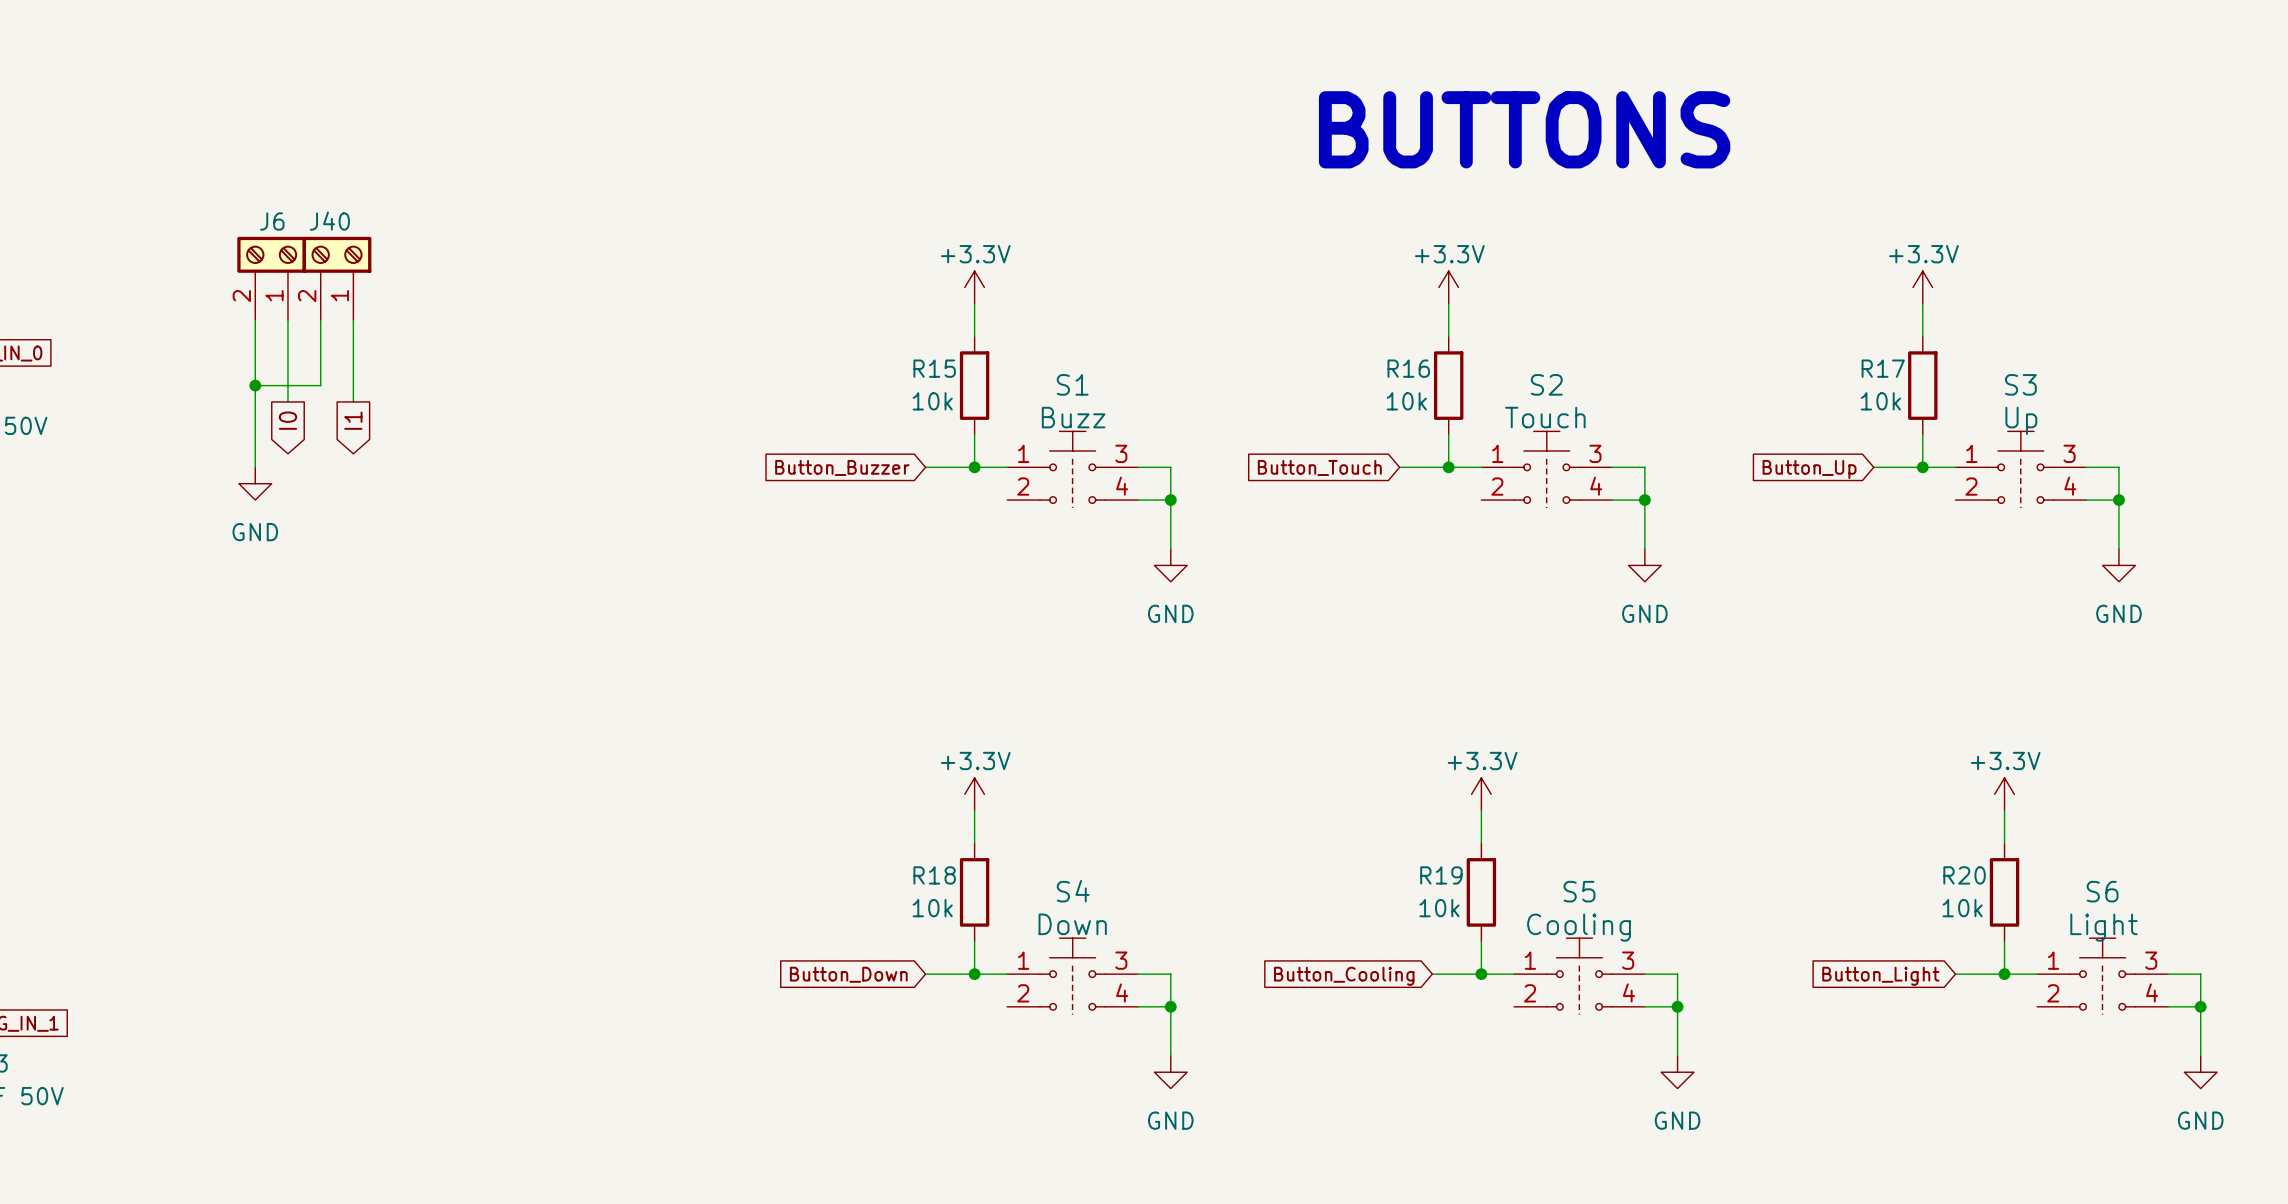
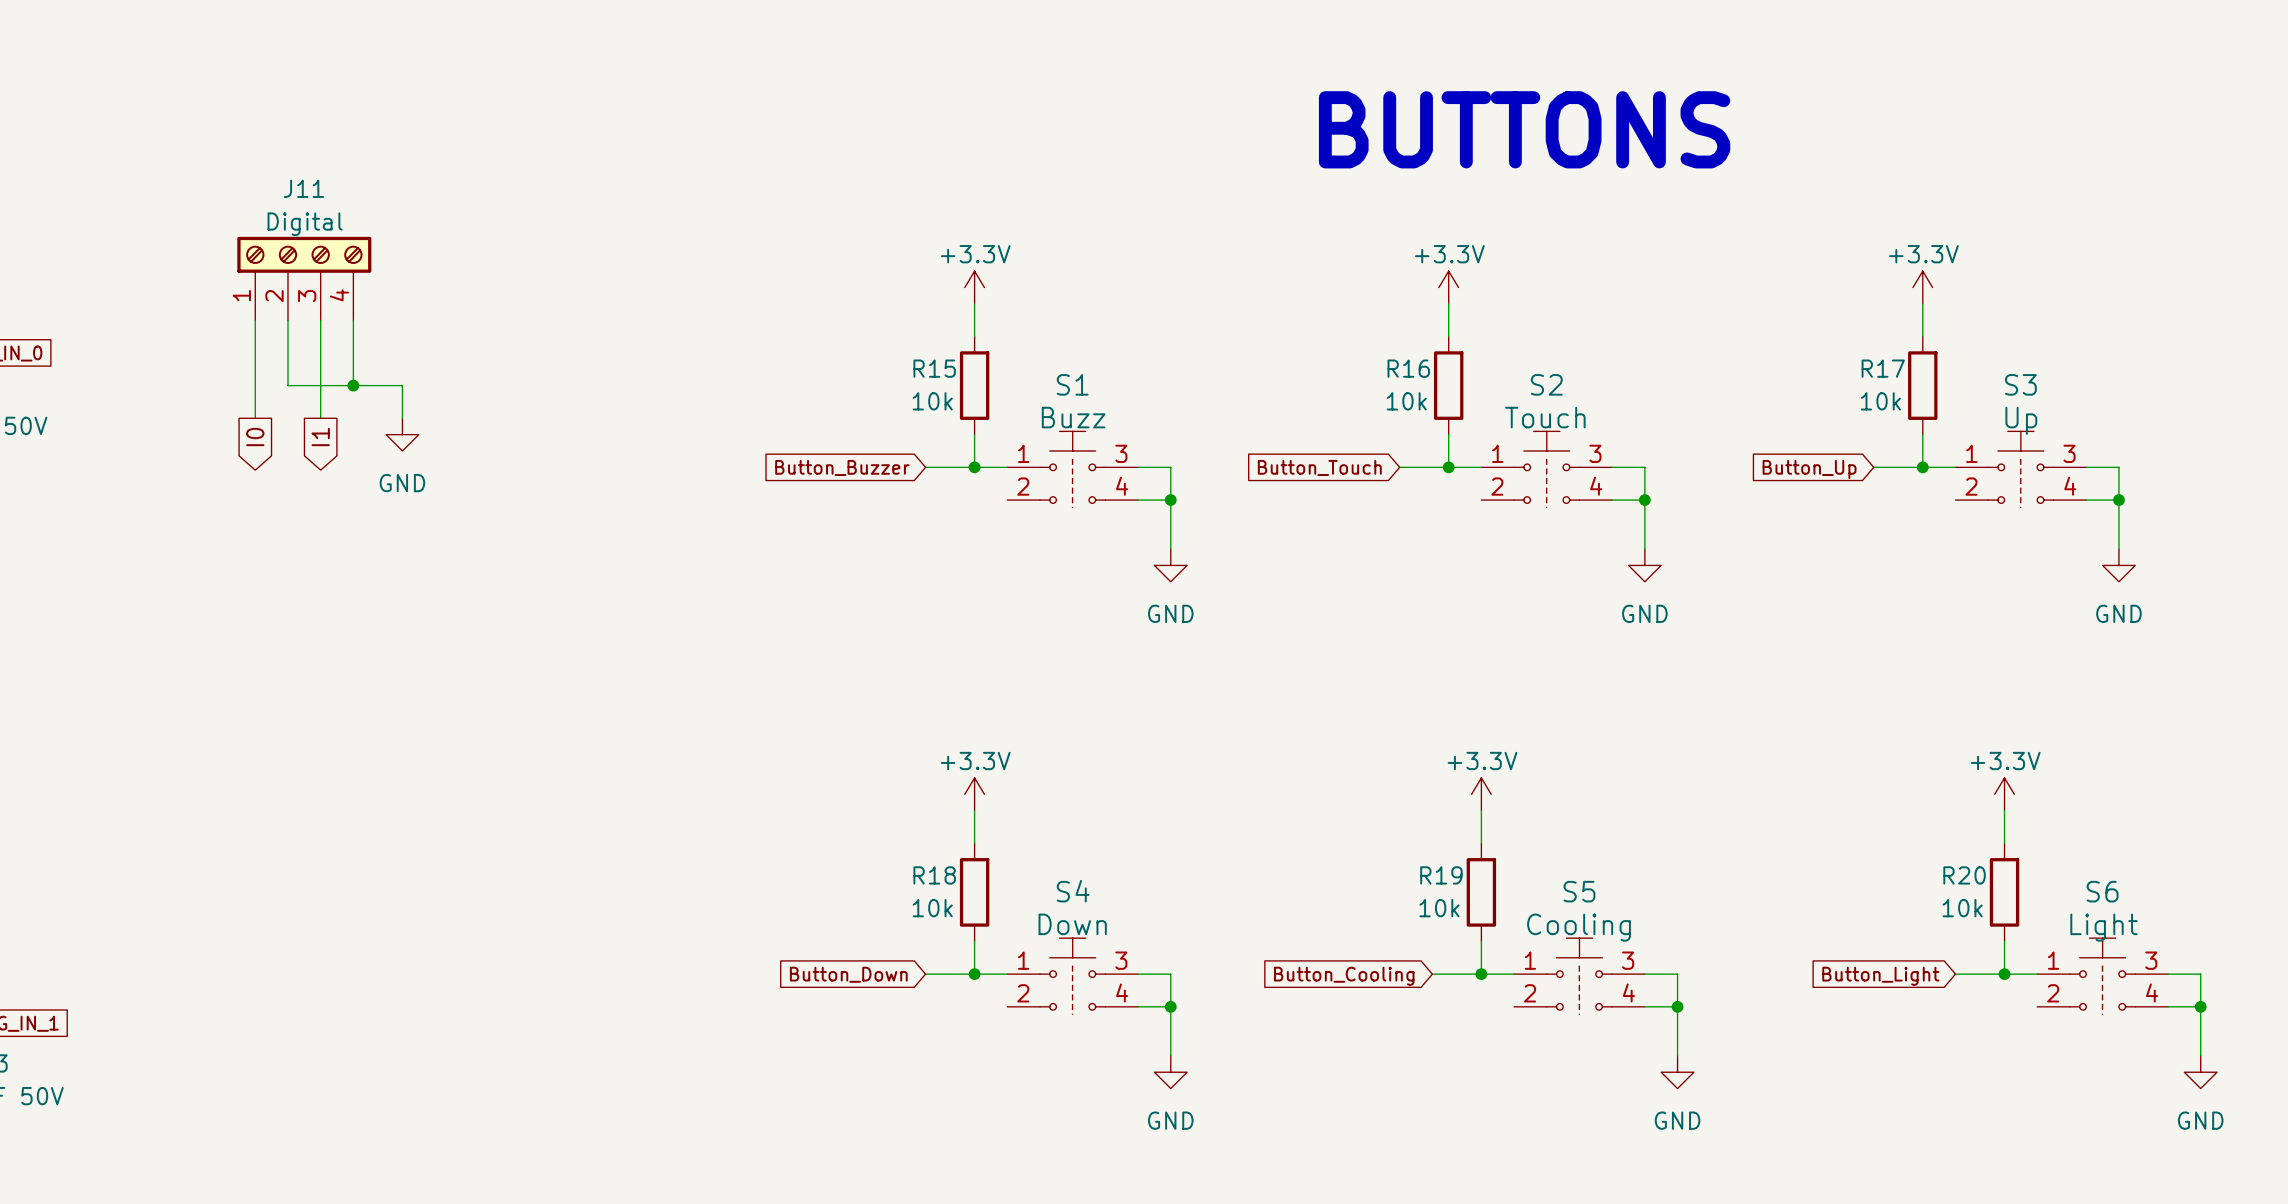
J6: (271, 278) -> none
J11: none -> Digital (304, 278)
J40: (337, 278) -> none
wire: (255, 385) (287, 385) (287, 401) -> none
junction: (255, 385) -> none
wire: (353, 385) (353, 401) -> none
junction: none -> (353, 385)
wire: (255, 418) (255, 467) -> none
wire: none -> (320, 418) (320, 385) (402, 385) (402, 418)
global label position: I0 (287, 420) -> I0 (255, 437)
global label position: I1 (353, 420) -> I1 (320, 437)
power symbol position: GND (255, 483) -> GND (402, 434)

